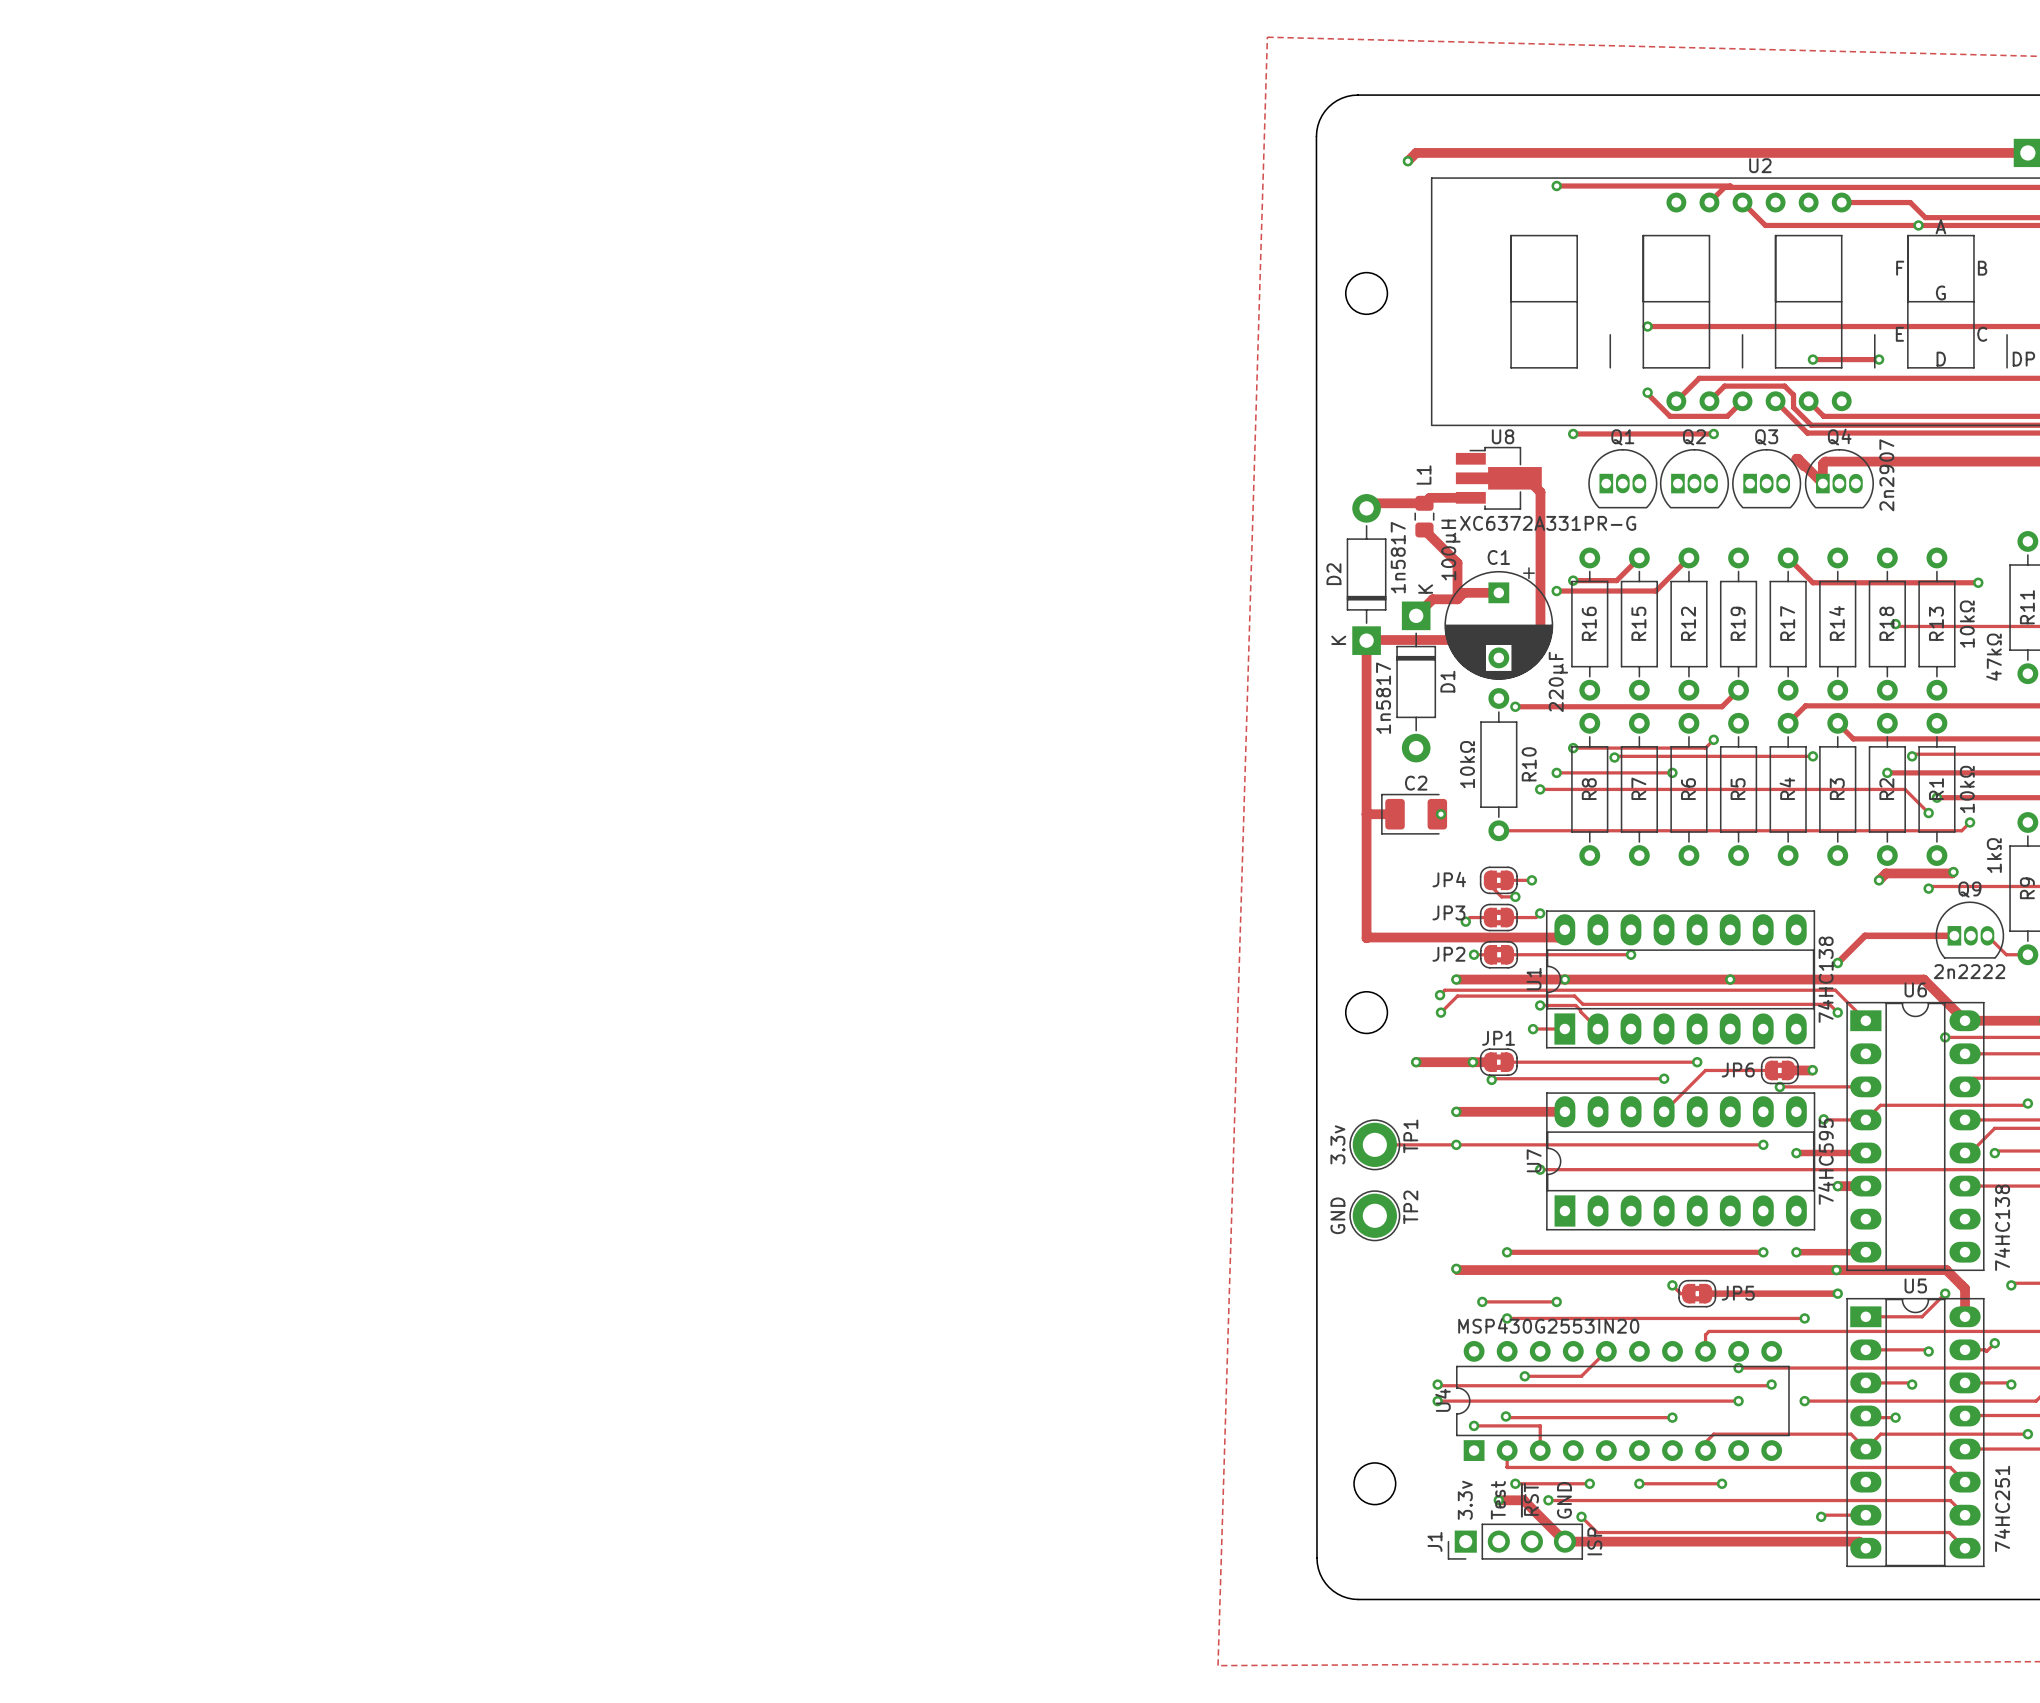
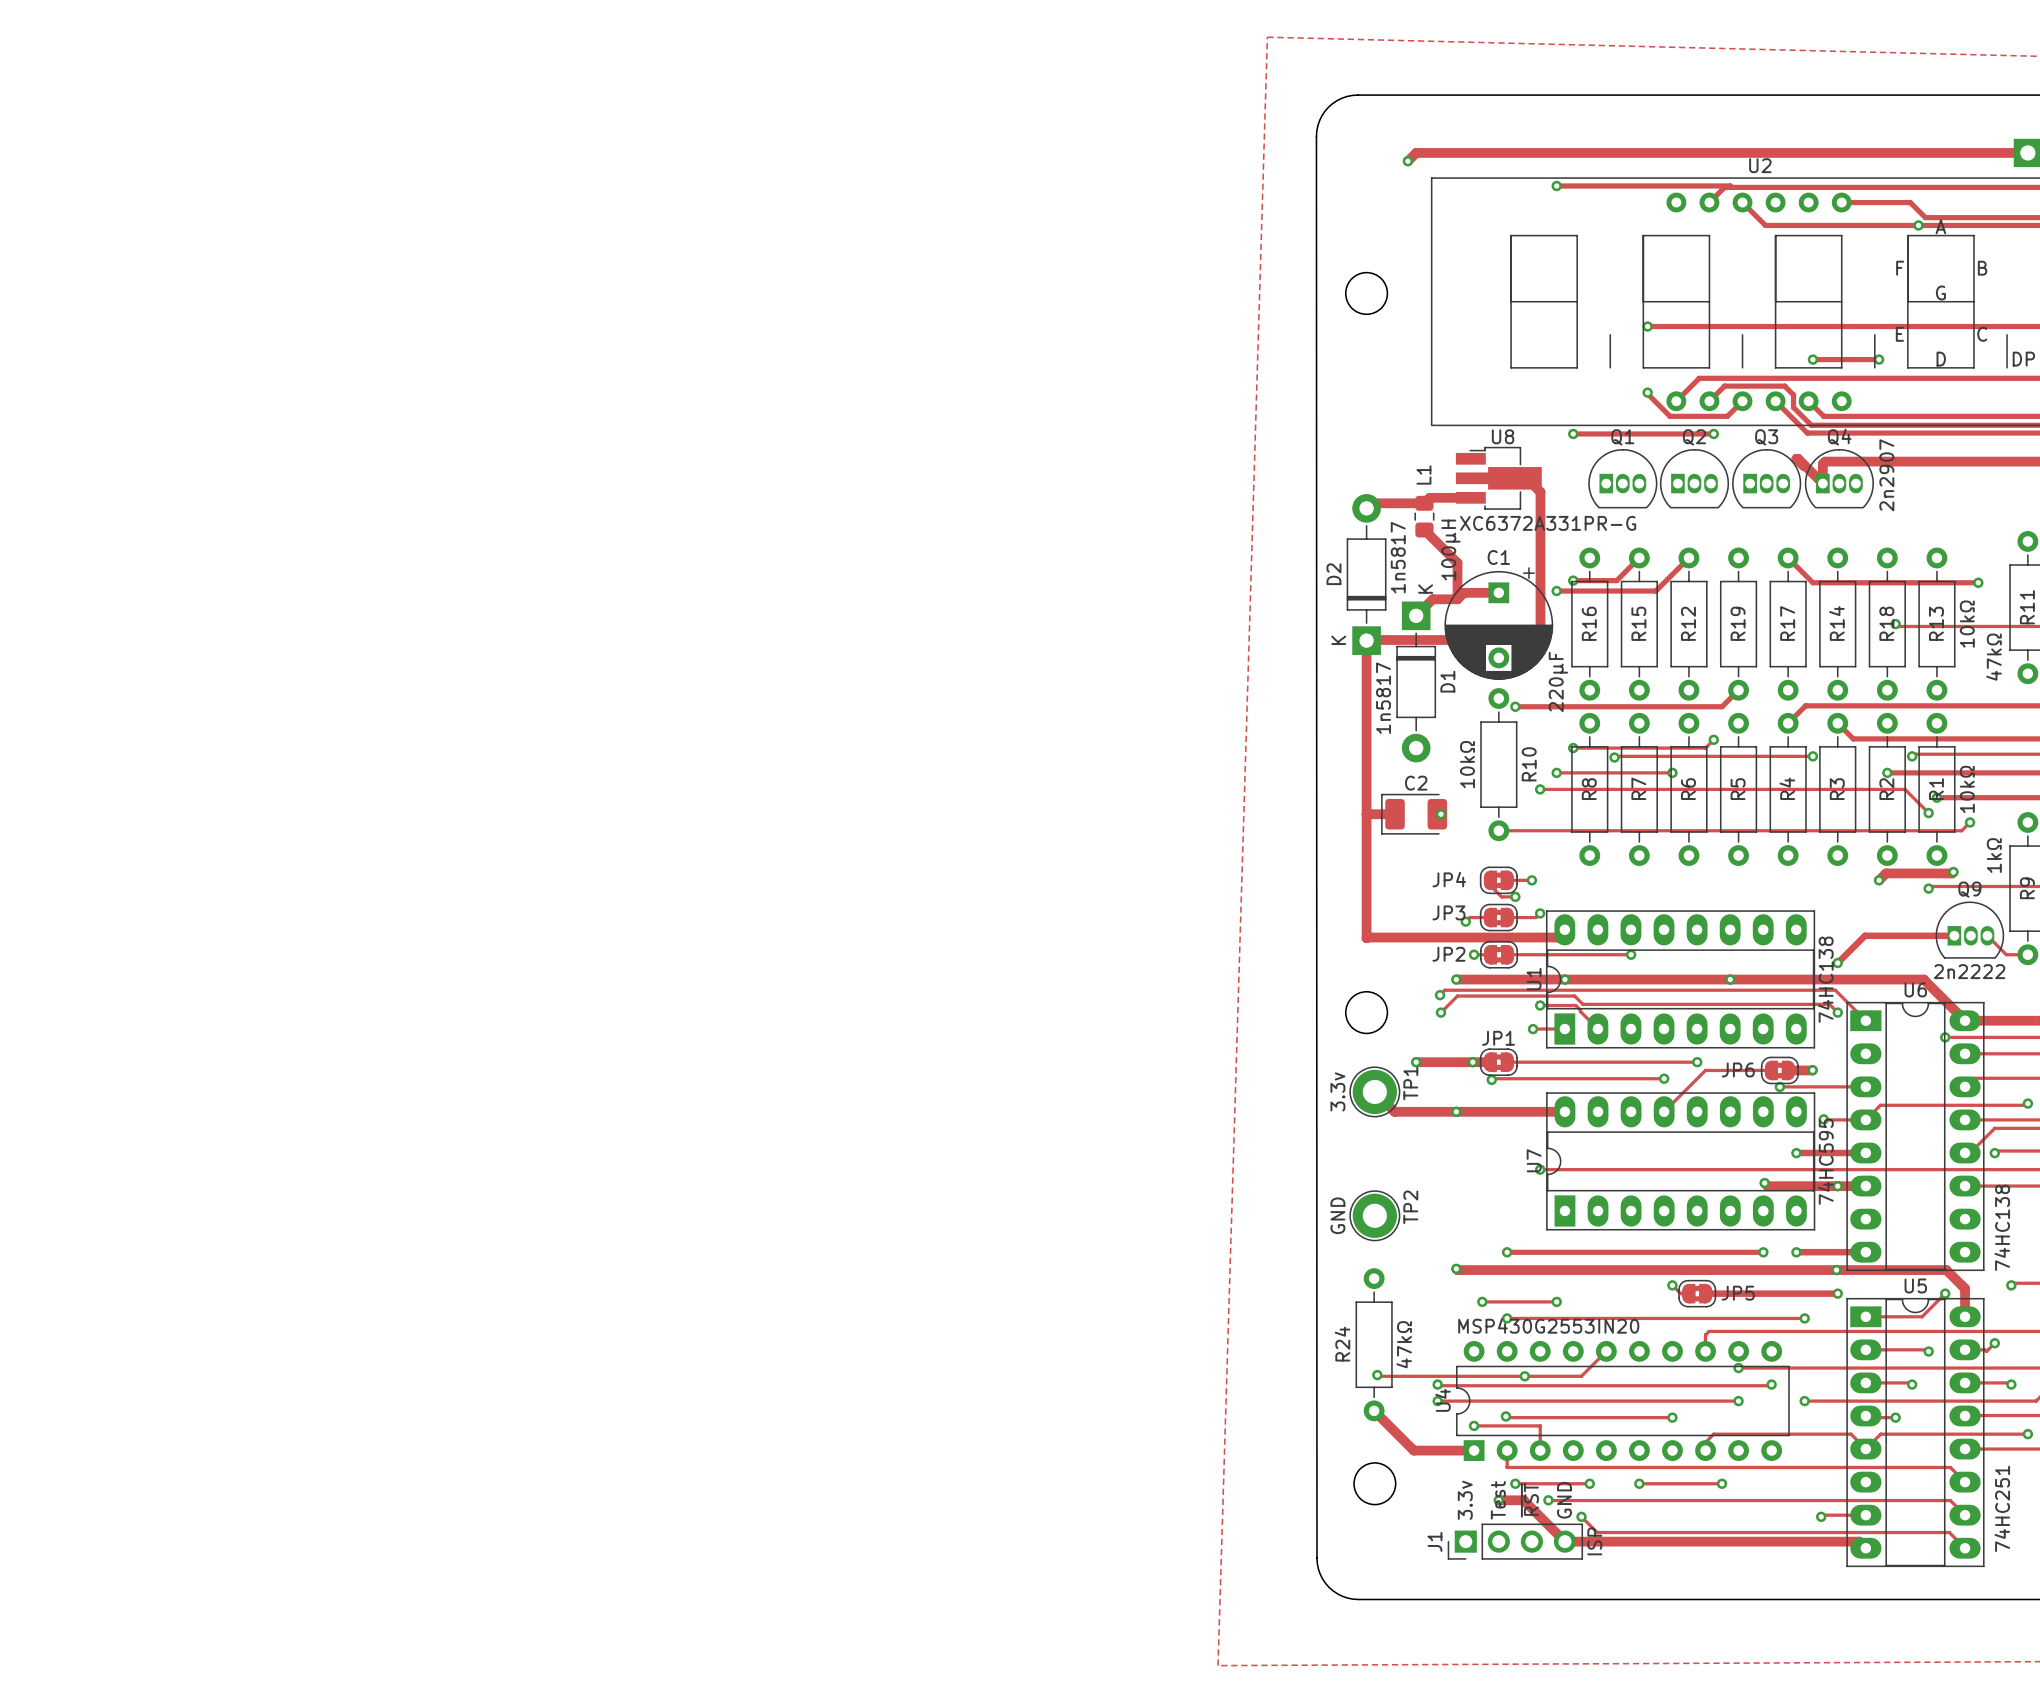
track: none -> (1374, 1091) (1394, 1111) (1456, 1111)
track: (1374, 1144) (1763, 1144) -> none
TP1 position: (1374, 1144) -> (1374, 1091)
via: (1456, 1144) -> none
via position: (1763, 1144) -> (1764, 1183)
track: none -> (1764, 1183) (1767, 1186) (1837, 1186)
R24: none -> 47kΩ (1374, 1344)
track: none -> (1377, 1375) (1524, 1376)
via: none -> (1377, 1375)
track: none -> (1374, 1410) (1413, 1450) (1474, 1450)

